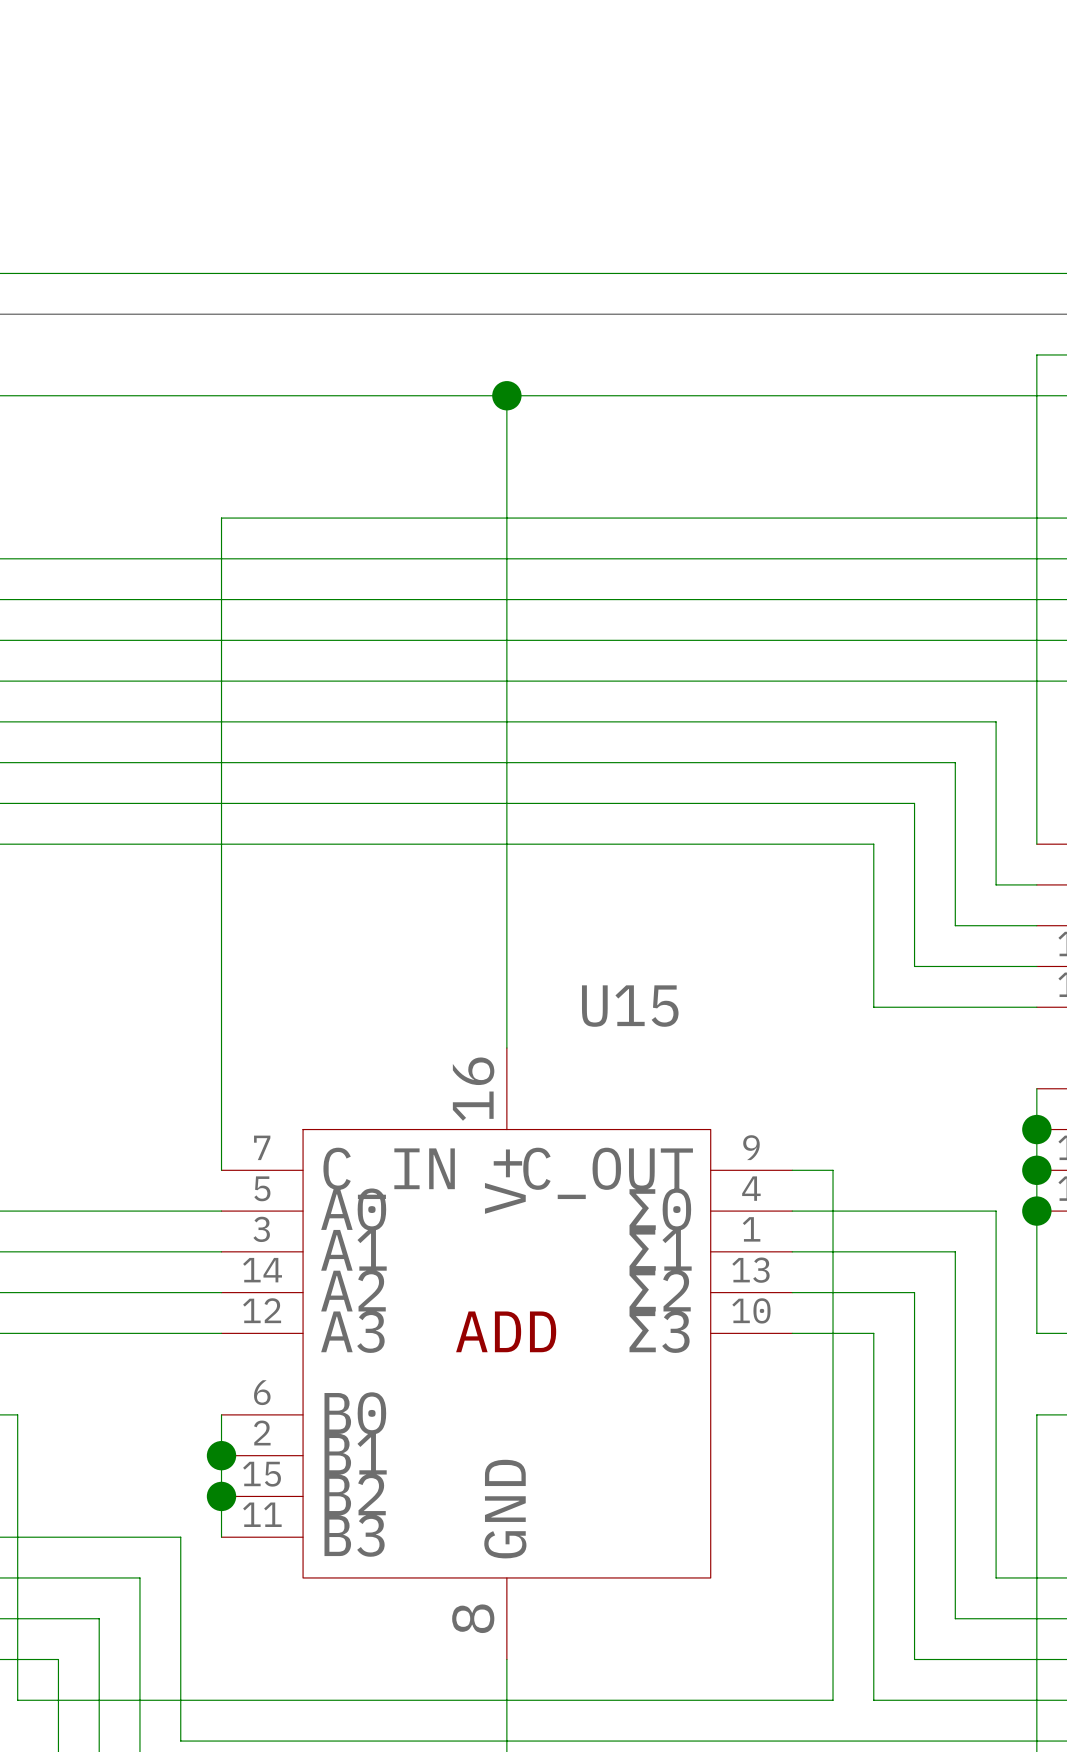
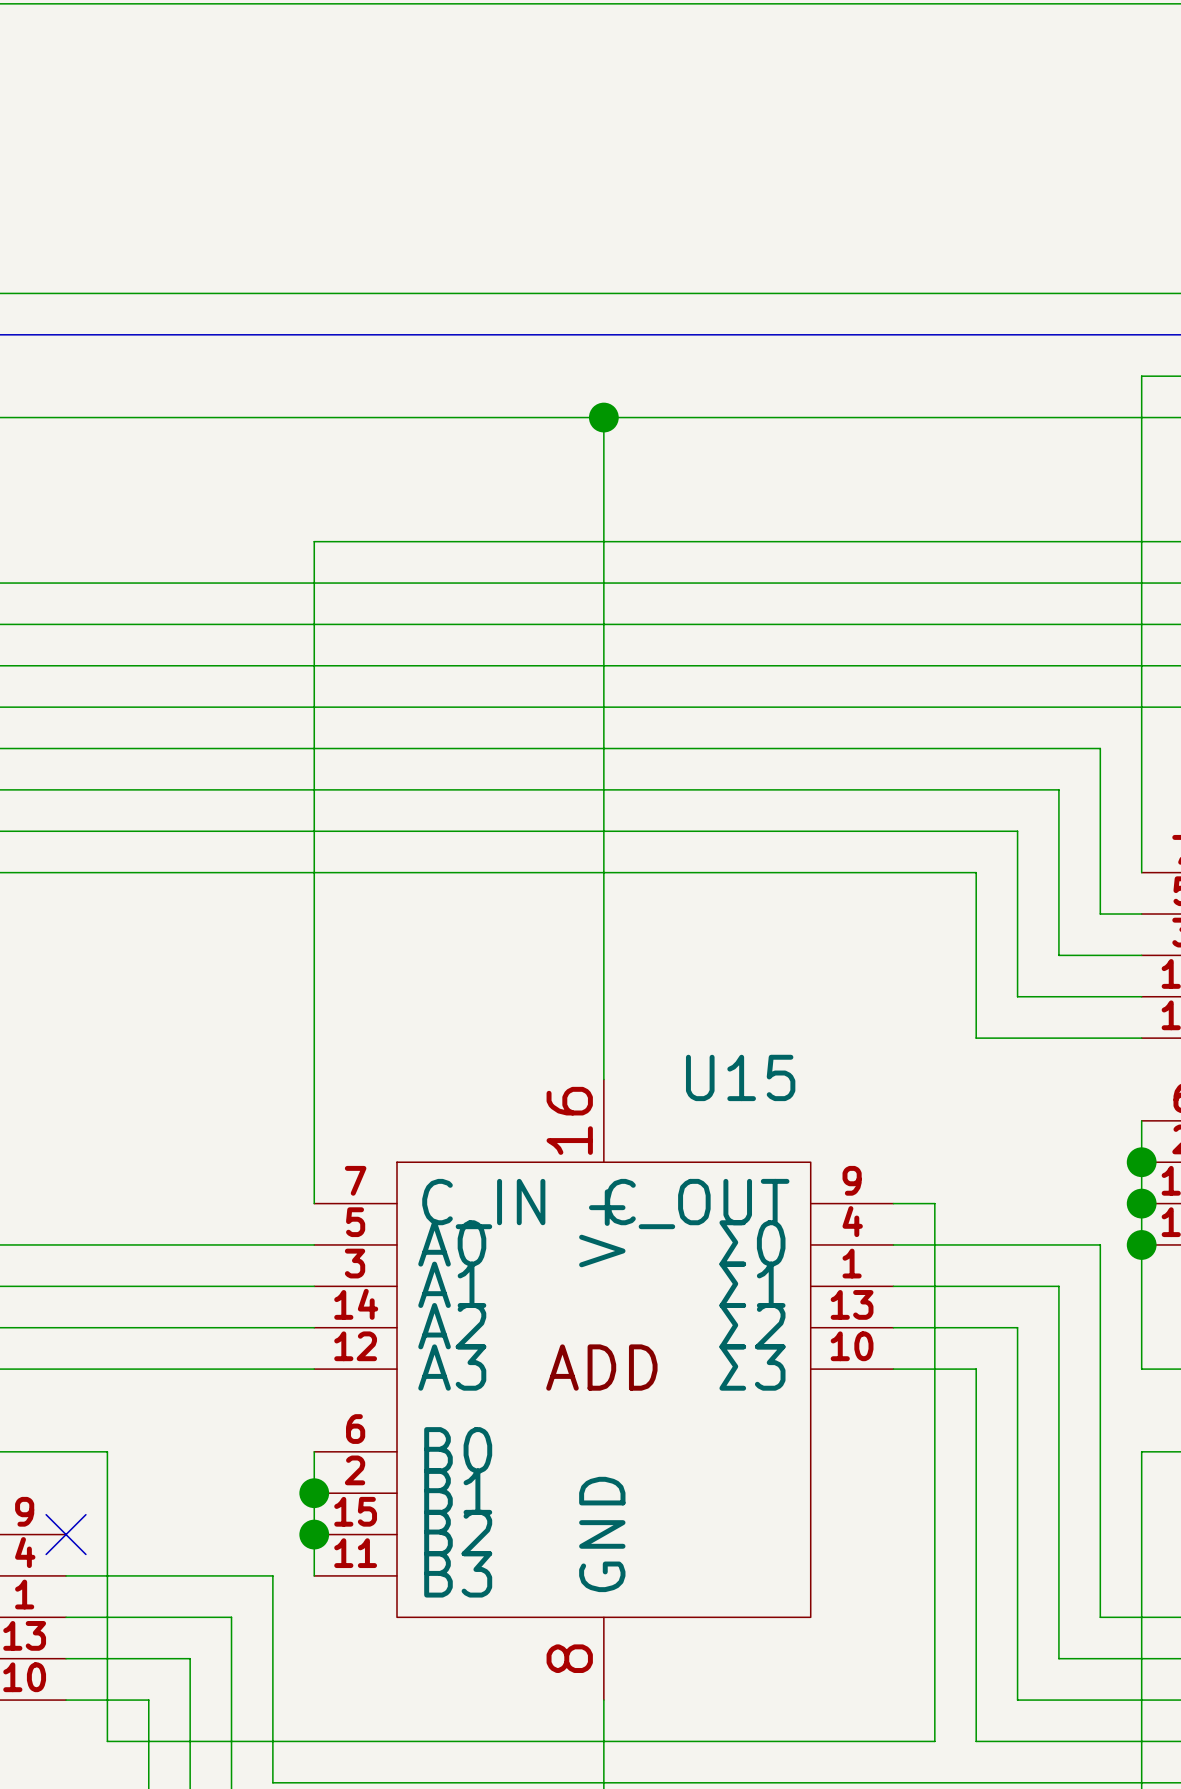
U15 name position: U15 (630, 1006) -> U15 (740, 1077)

